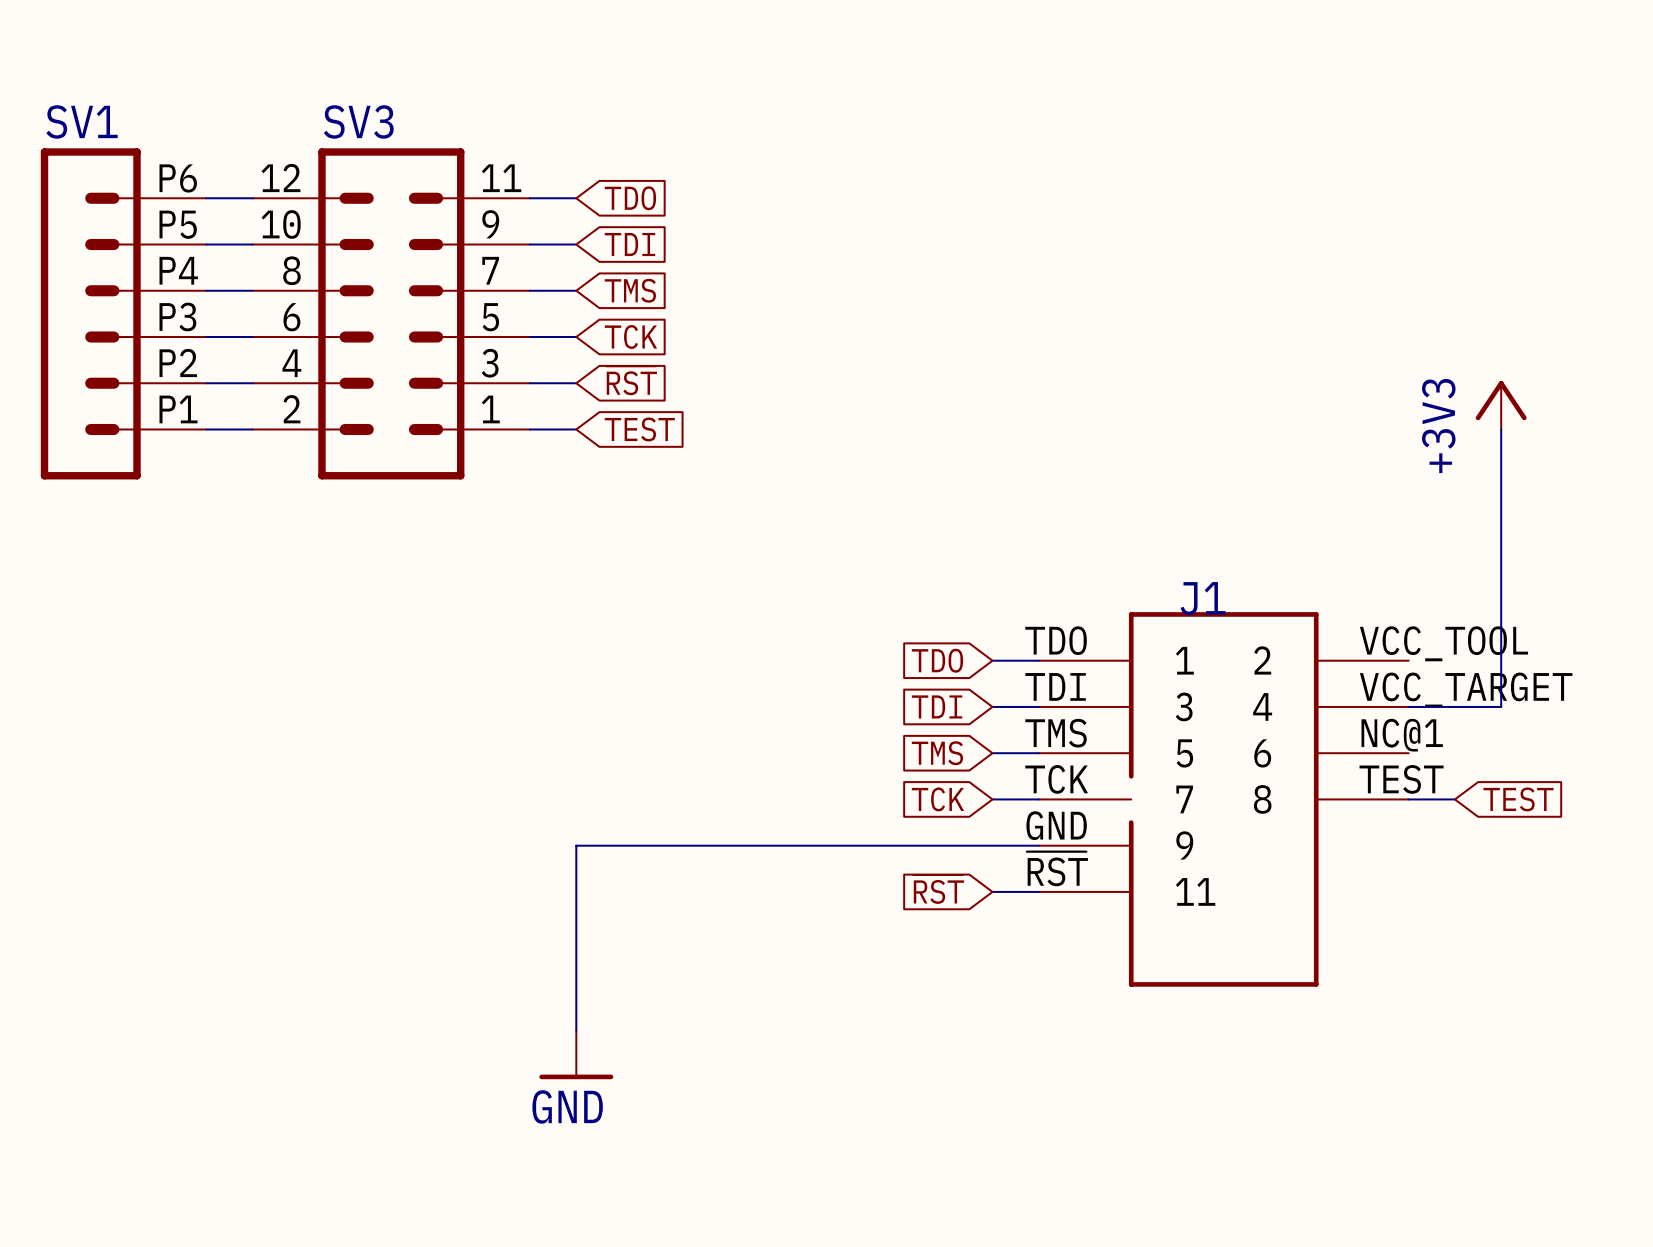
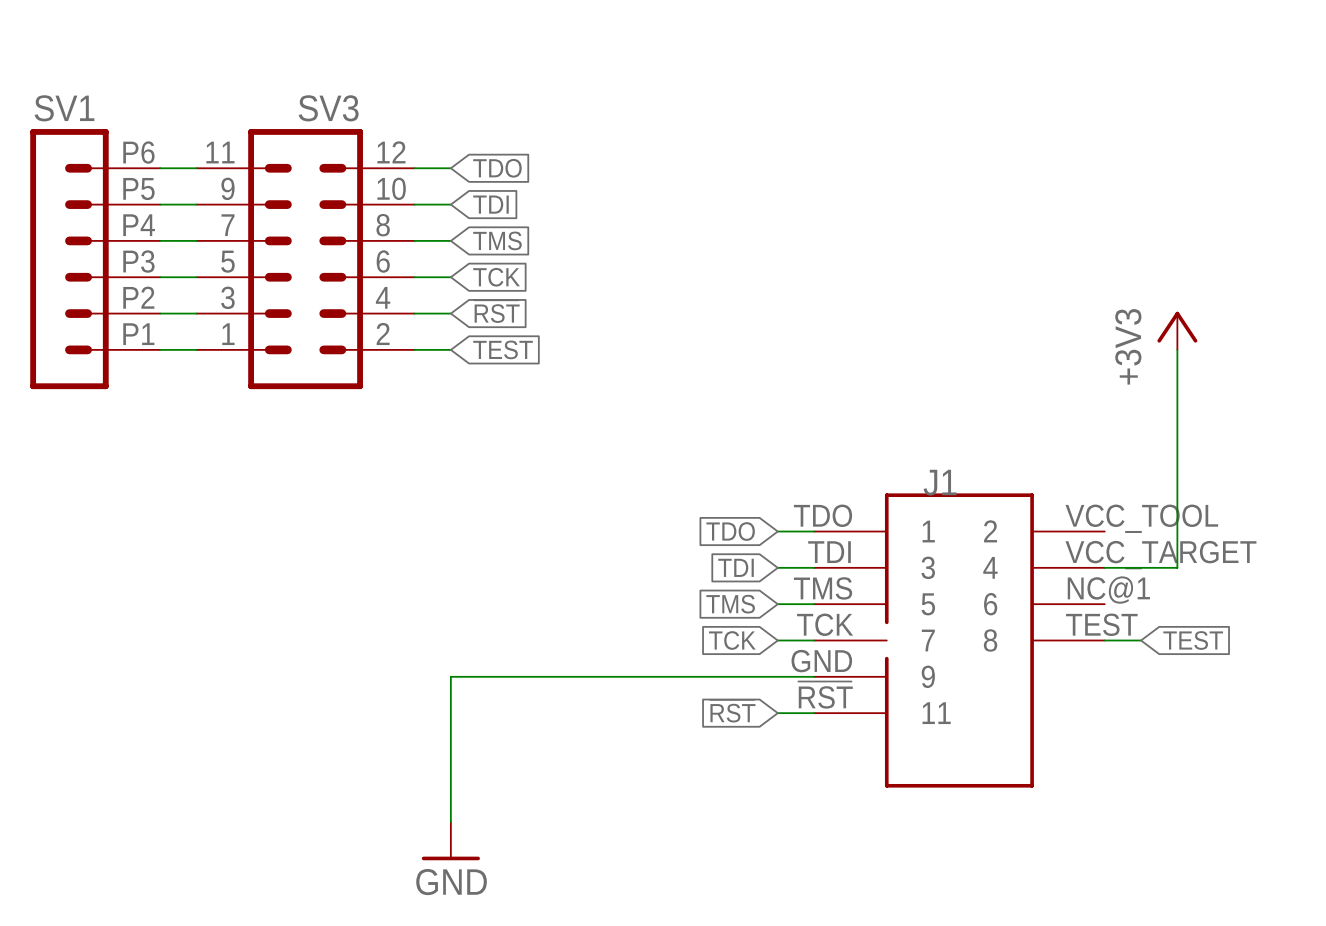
SV3 flip: as is (391, 313) -> left-right (305, 259)

